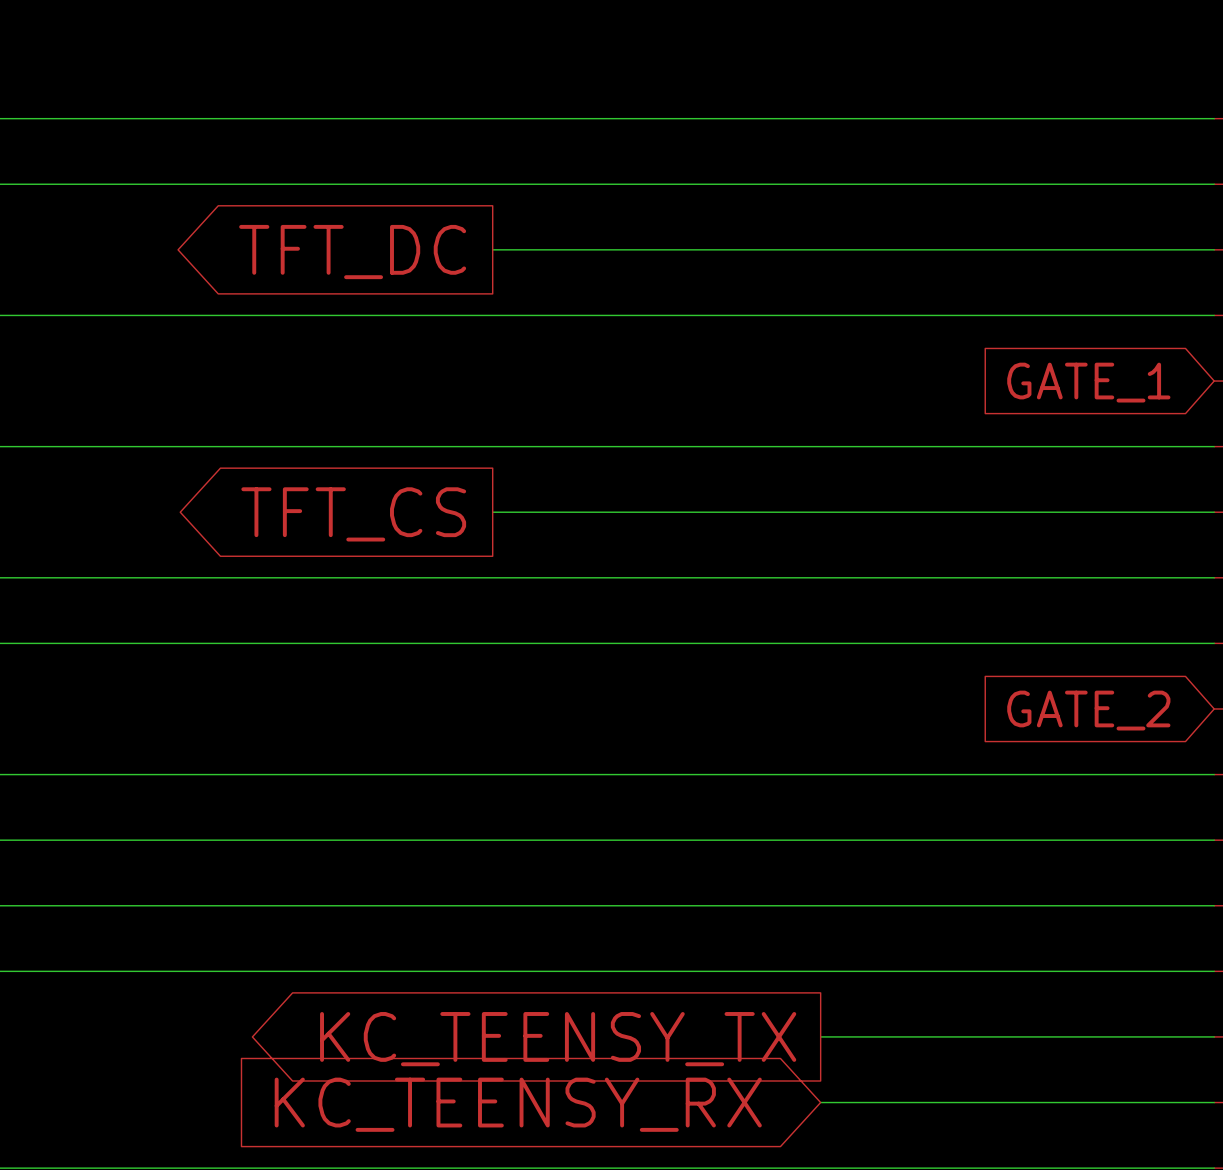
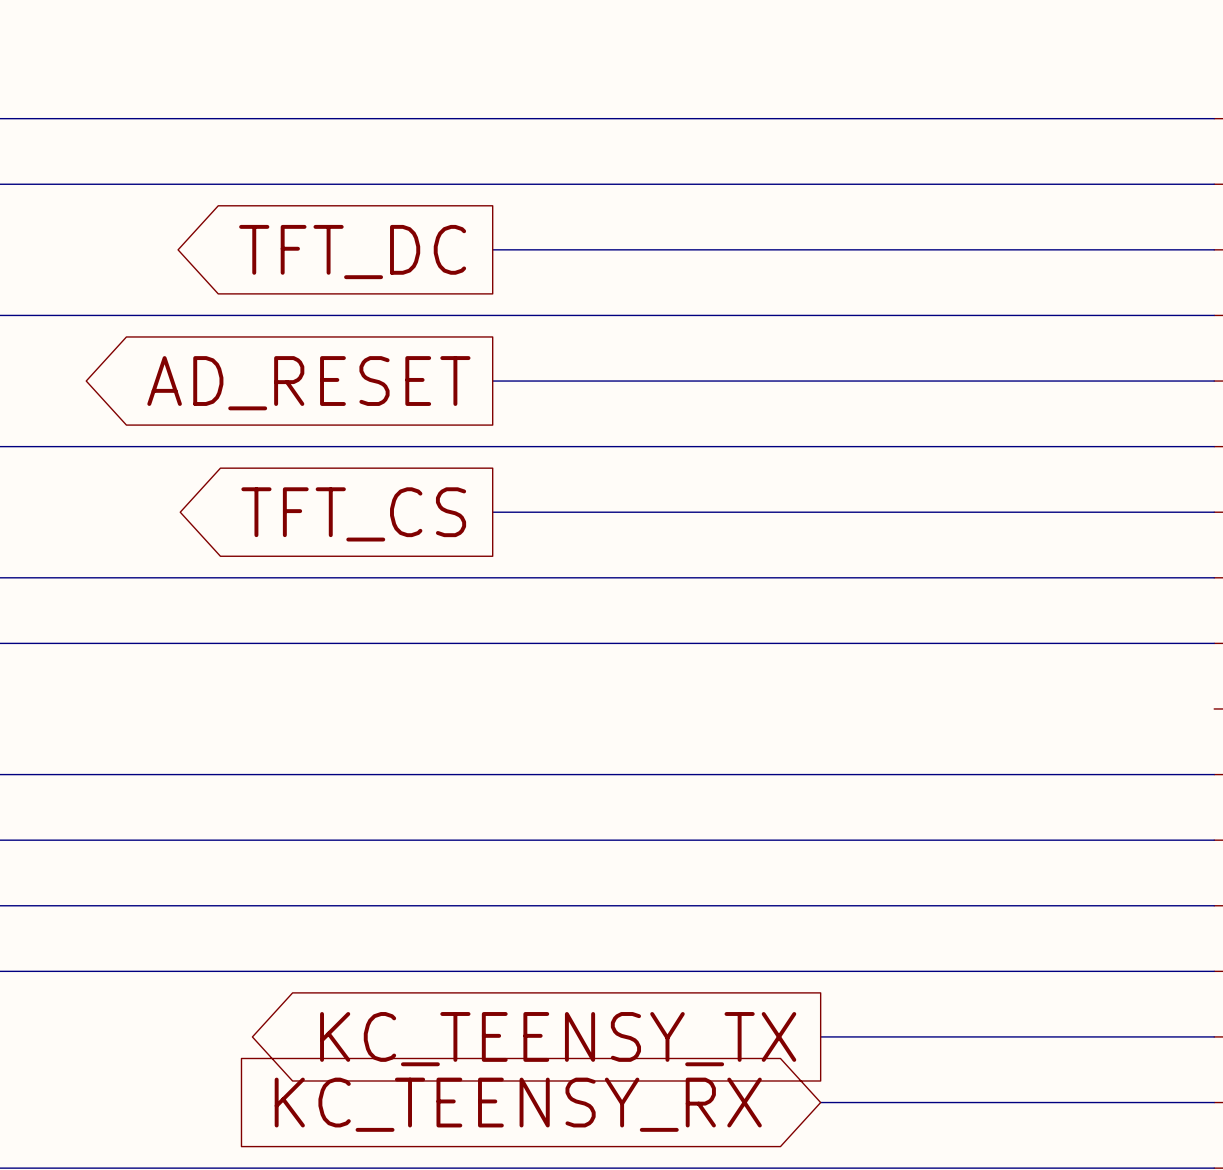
wire: none -> (492, 381) (1214, 381)
global label: GATE_1 (1088, 382) -> none
global label: none -> AD_RESET (308, 383)
global label: GATE_2 (1088, 710) -> none

